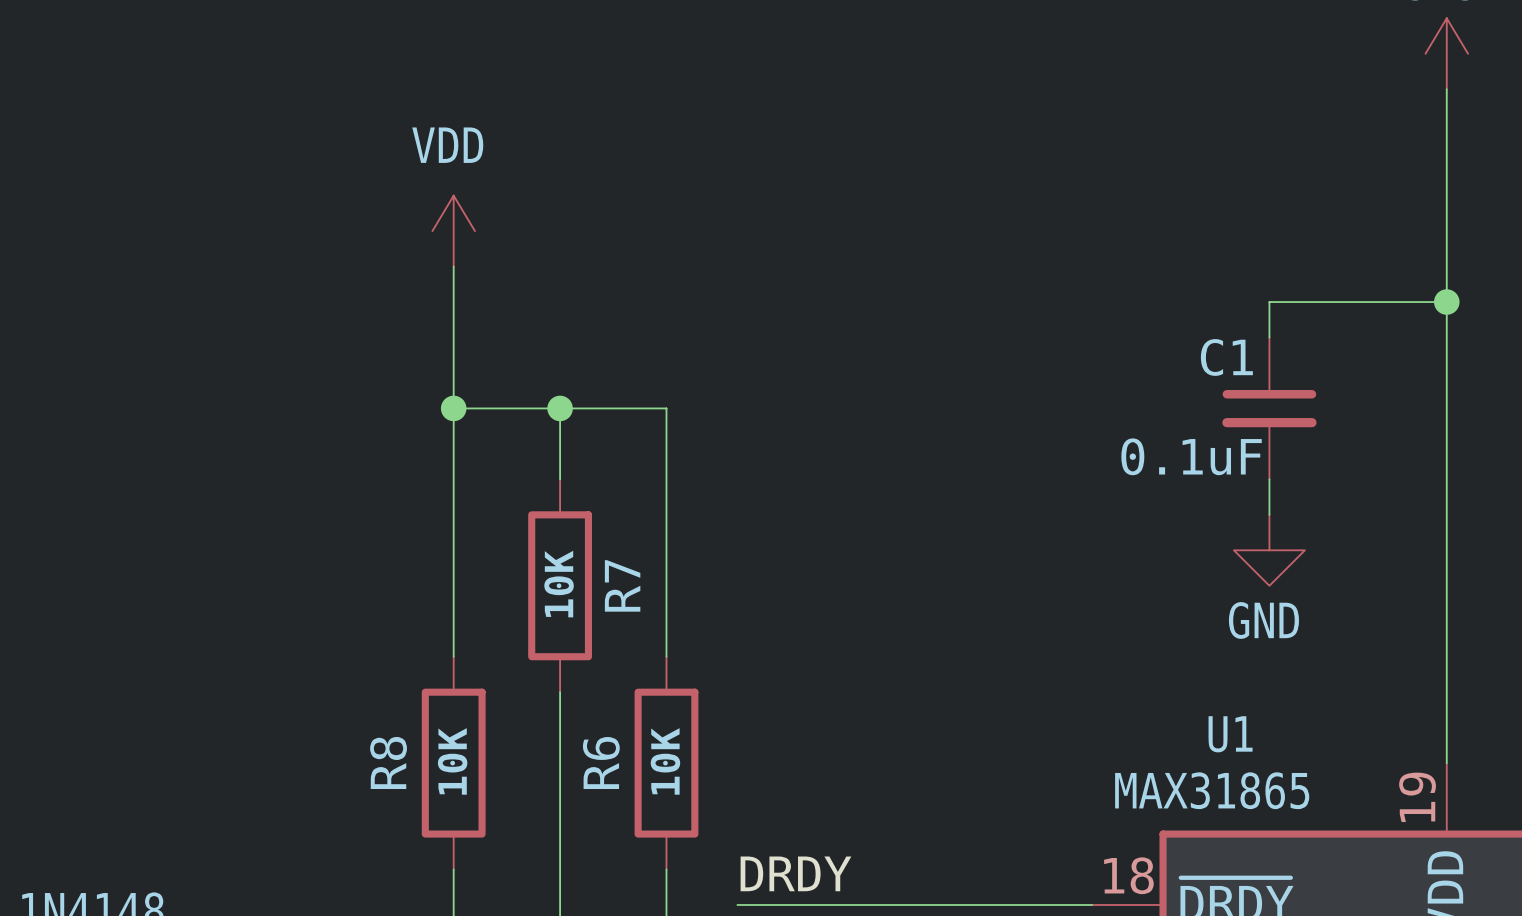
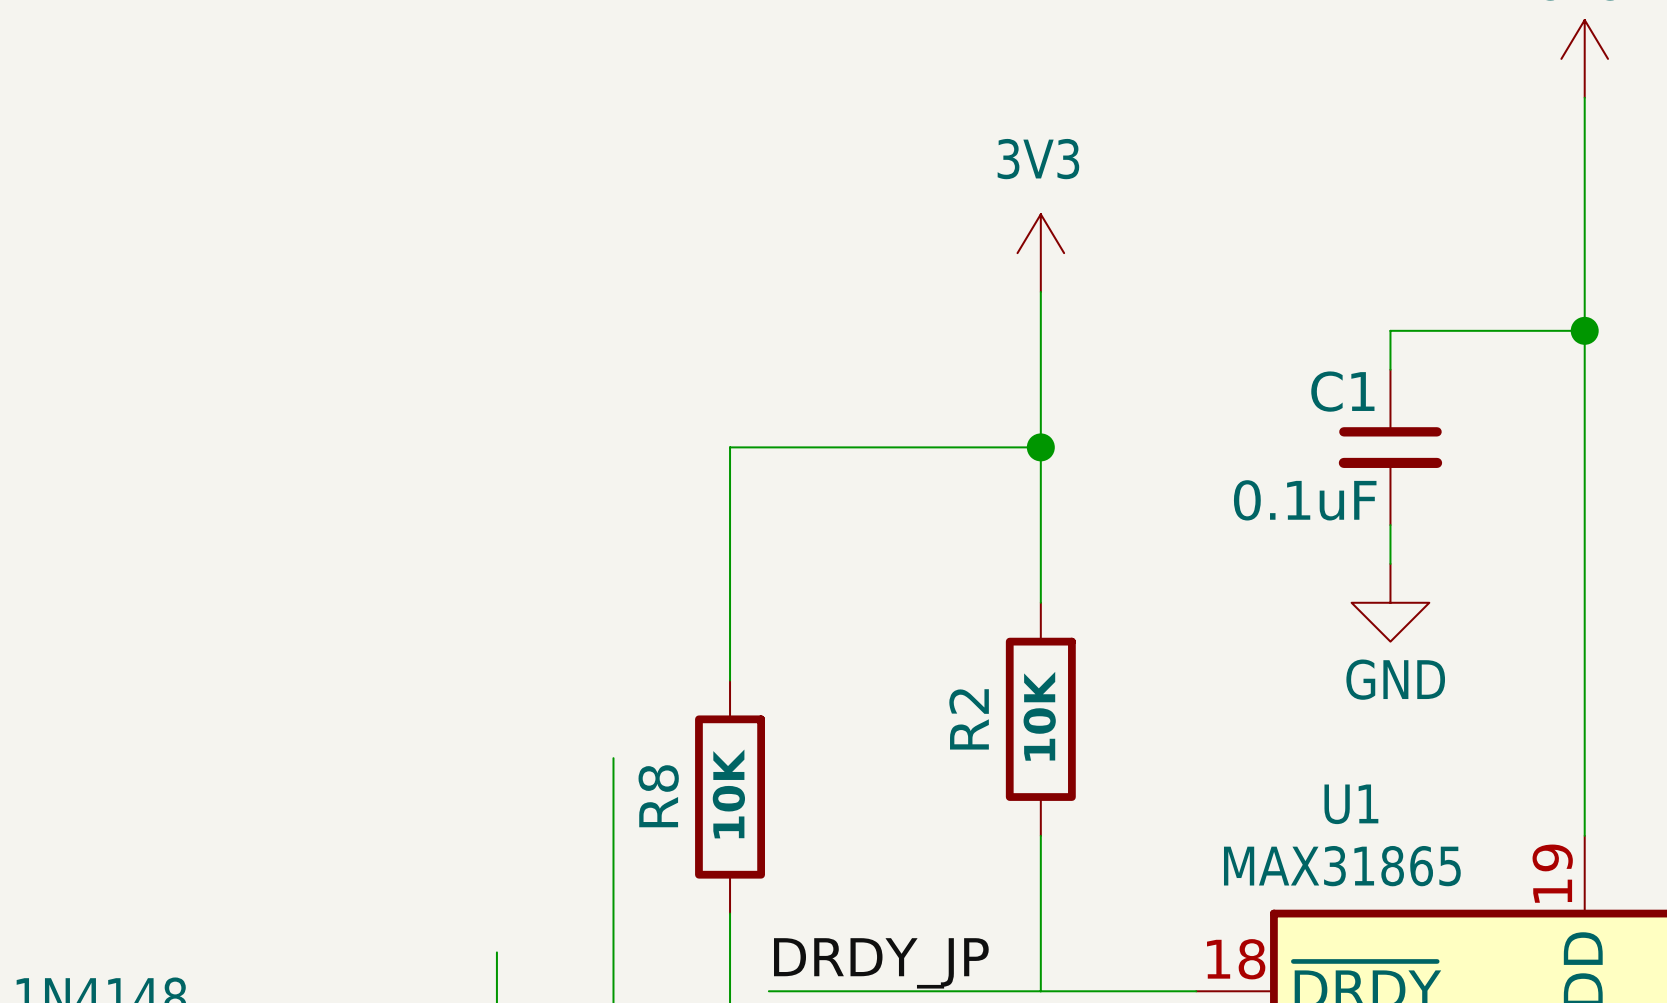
power symbol: VDD (453, 231) -> none
power symbol: none -> 3V3 (1040, 253)
wire: (453, 266) (453, 656) -> none
wire: none -> (1040, 291) (1040, 602)
wire: (453, 408) (666, 408) -> (1040, 447) (730, 447)
junction: (453, 408) -> none
wire: (560, 408) (560, 479) -> none
junction: (560, 408) -> none
junction: none -> (1040, 447)
R7: 10K (560, 585) -> none
R2: none -> 10K (1040, 719)
R8 position: (453, 763) -> (730, 797)
R6: 10K (666, 763) -> none
wire: none -> (1040, 835) (1040, 991)
label: DRDY (795, 873) -> DRDY_JP (881, 963)
wire: none -> (768, 991) (807, 991)

